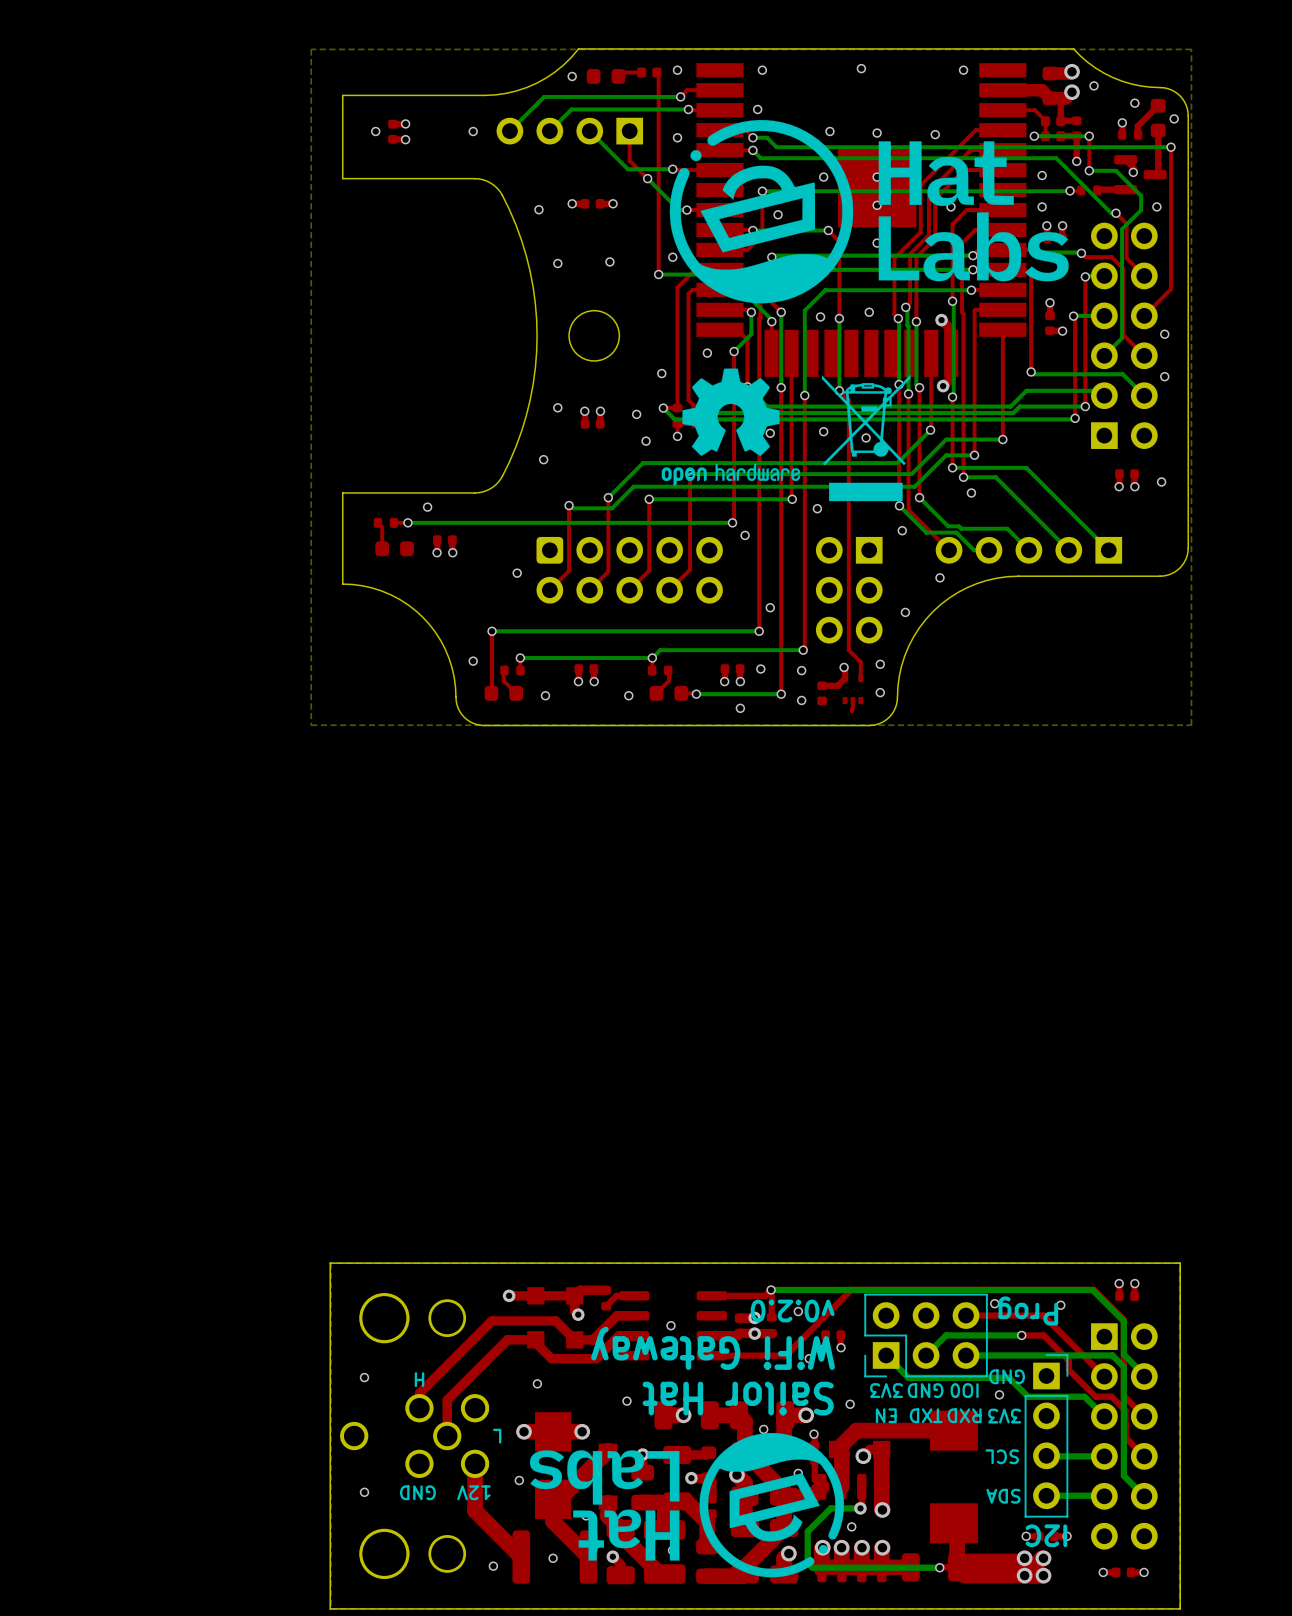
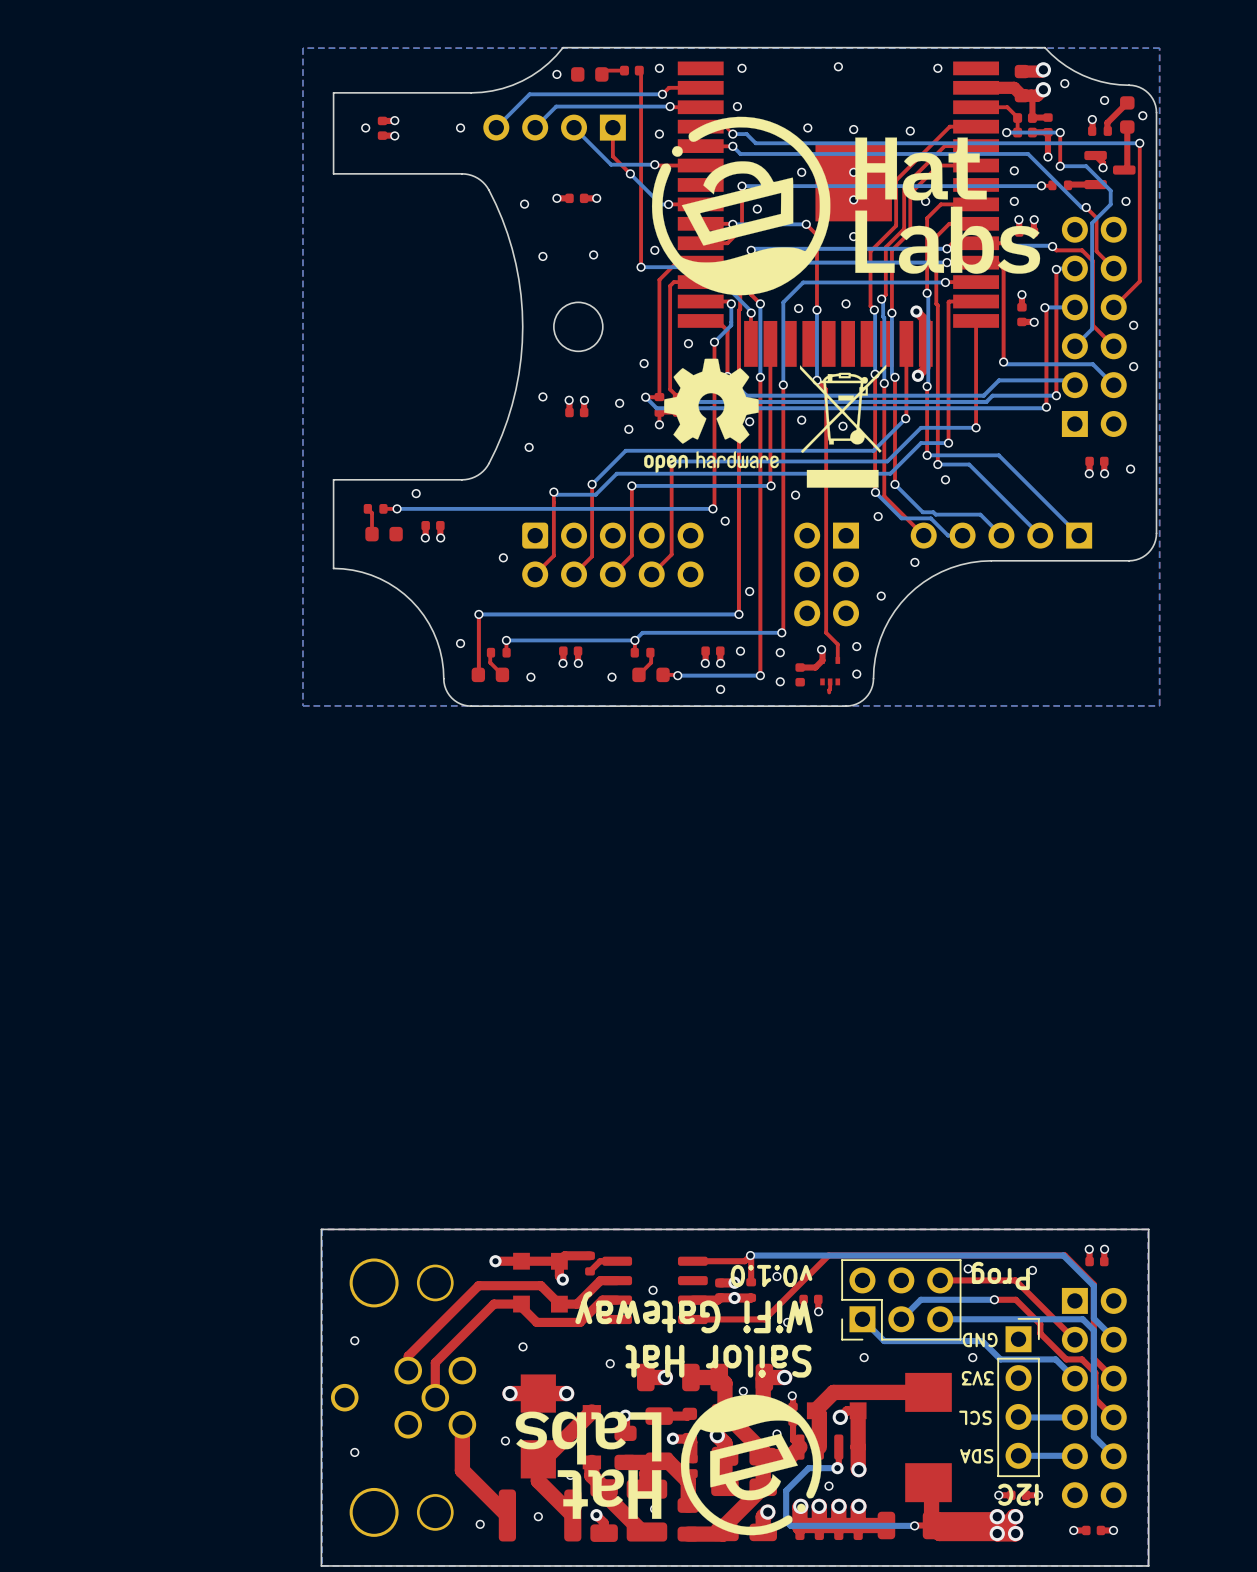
text: v0.2.0 (792, 1310) -> v0.1.0 (771, 1275)
text: H (419, 1379) -> none
text: 3V3 (886, 1390) -> none
text: GND (925, 1390) -> none
text: IO0 (964, 1390) -> none
via position: (850, 1404) -> (864, 1357)
text: EN (886, 1415) -> none
text: TXD (926, 1415) -> none
text: RXD (964, 1415) -> none
text: L (497, 1436) -> none
text: GND (417, 1492) -> none
text: 12V (473, 1492) -> none

